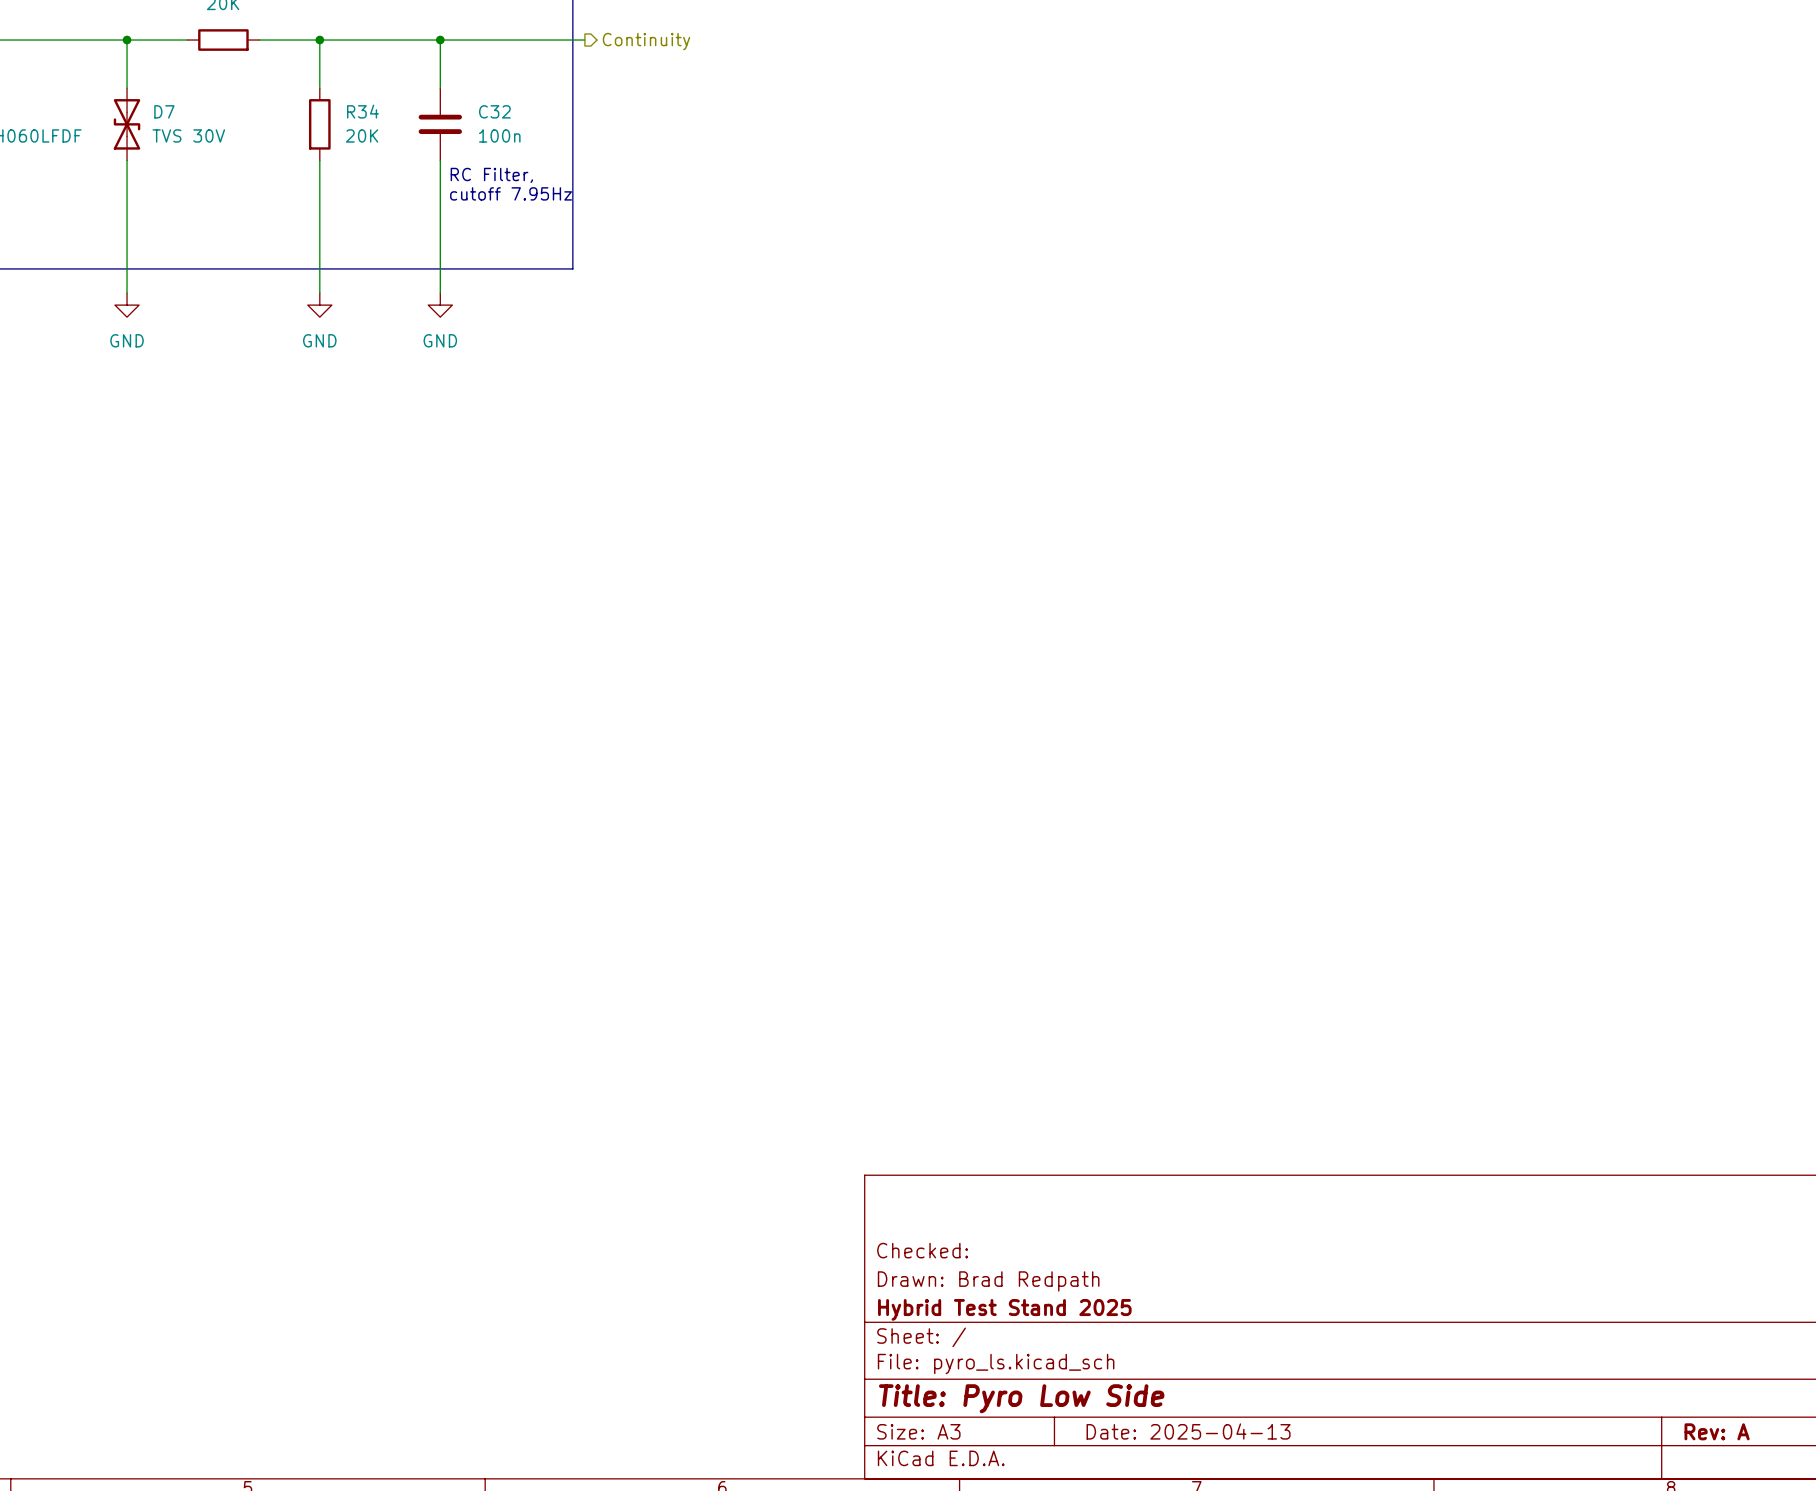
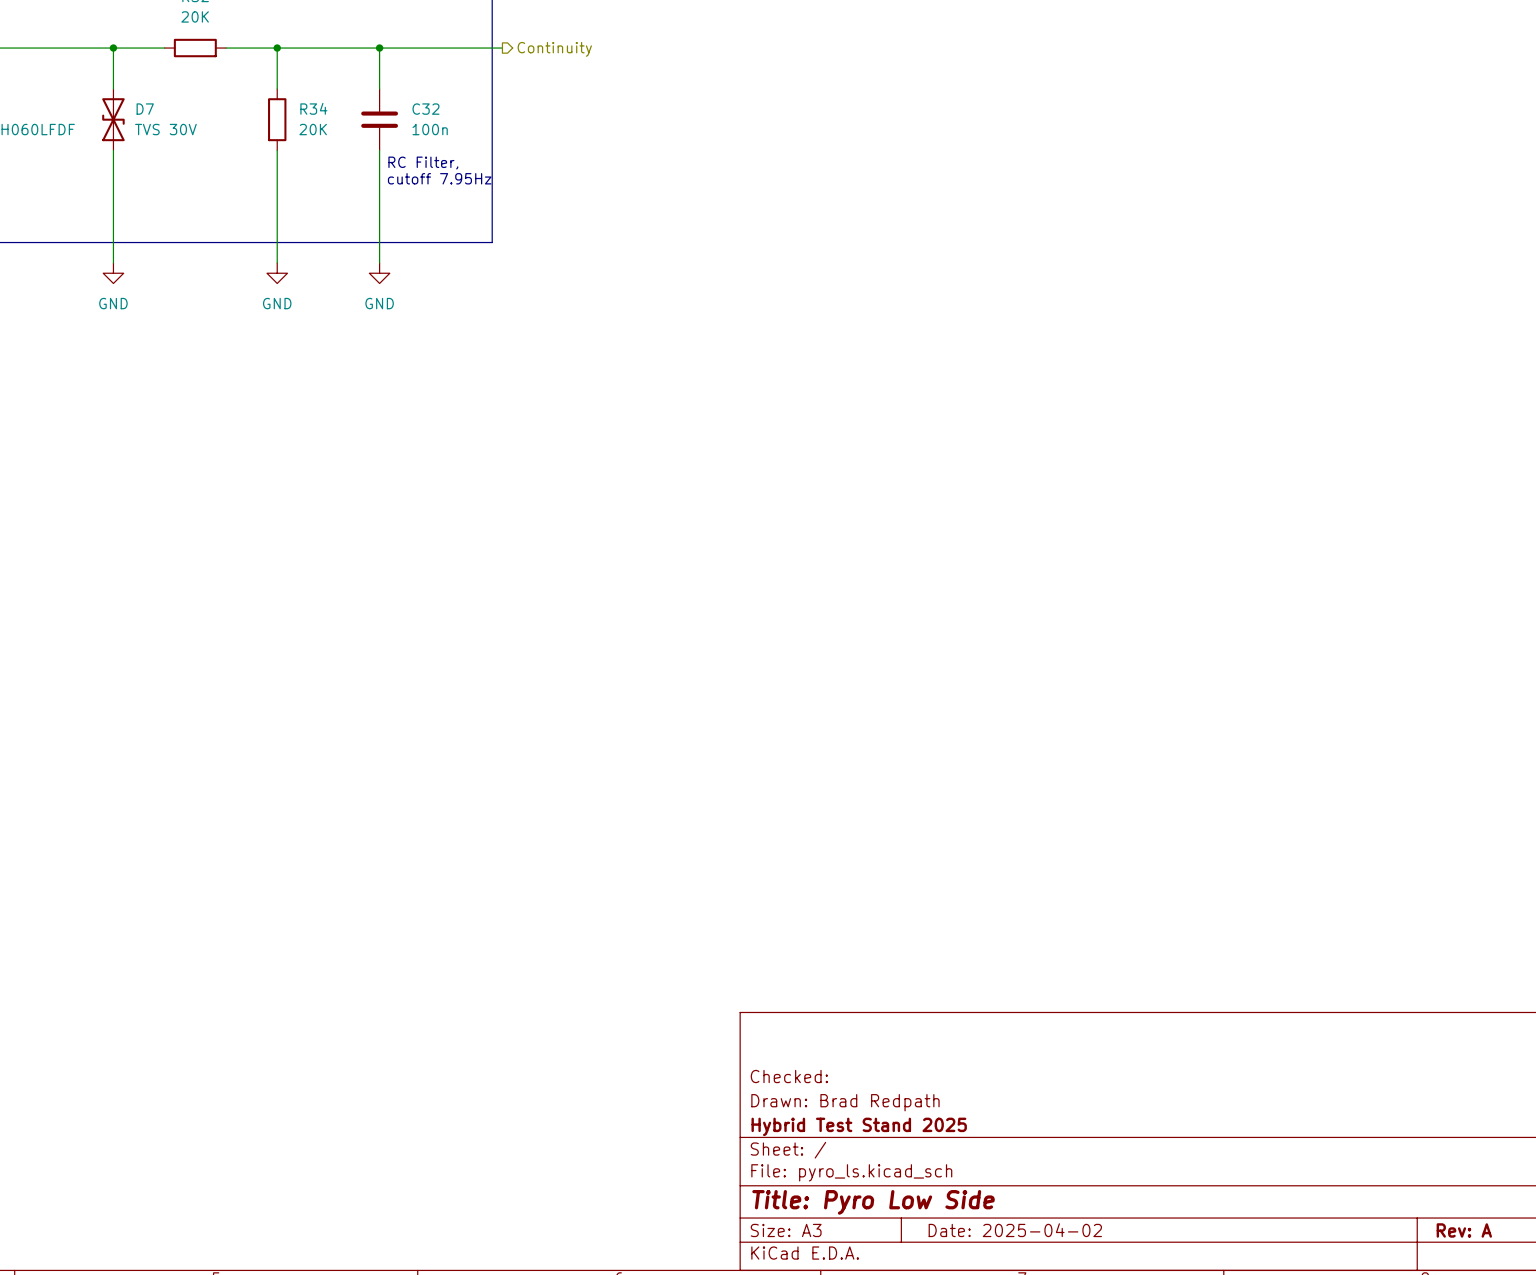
title block: Date: 2025-04-13 (1188, 1431) -> Date: 2025-04-02 (1015, 1230)

